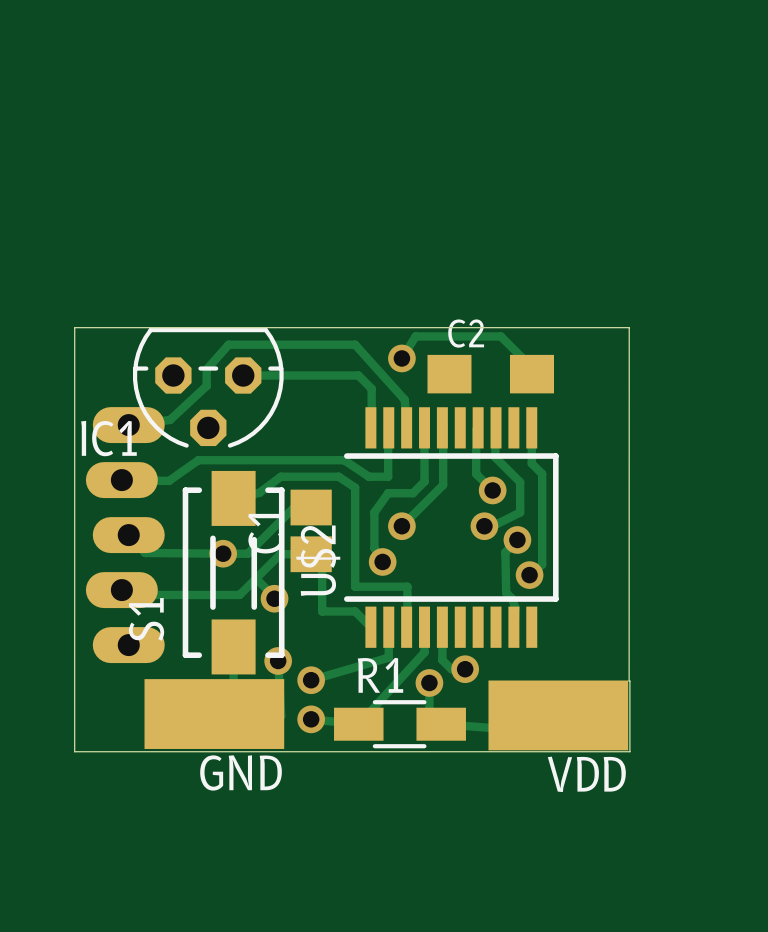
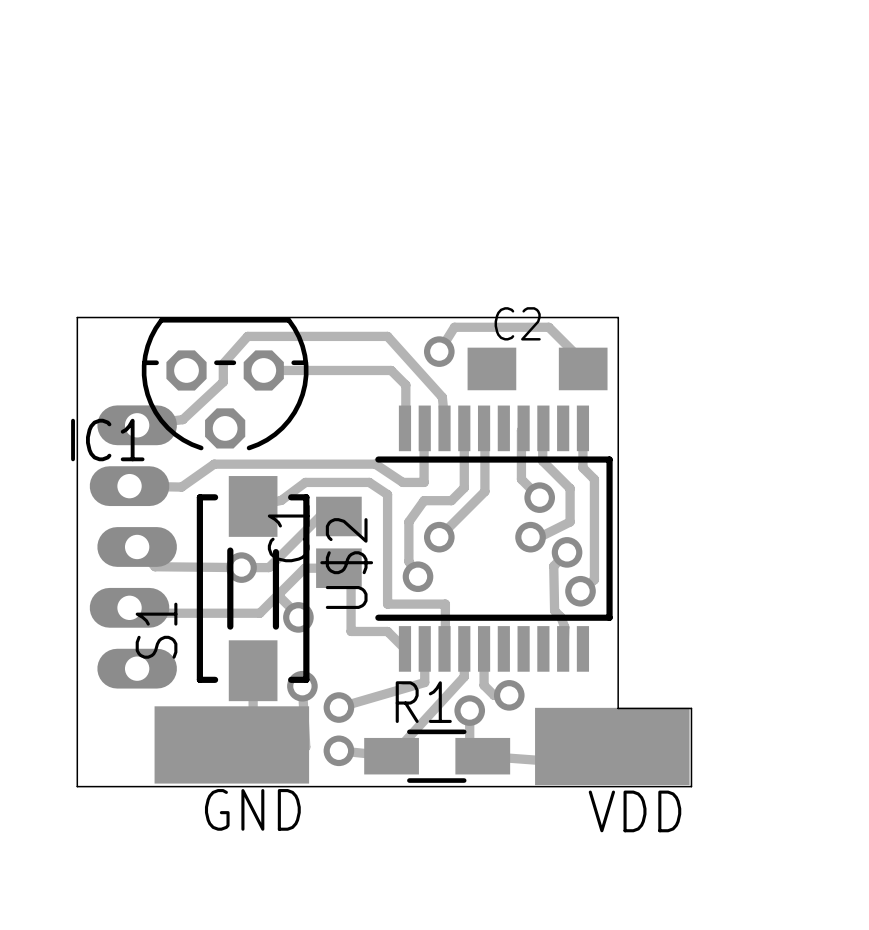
board edge: (563, 327) (629, 327) (629, 681) -> (618, 317) (618, 708) (690, 708)

